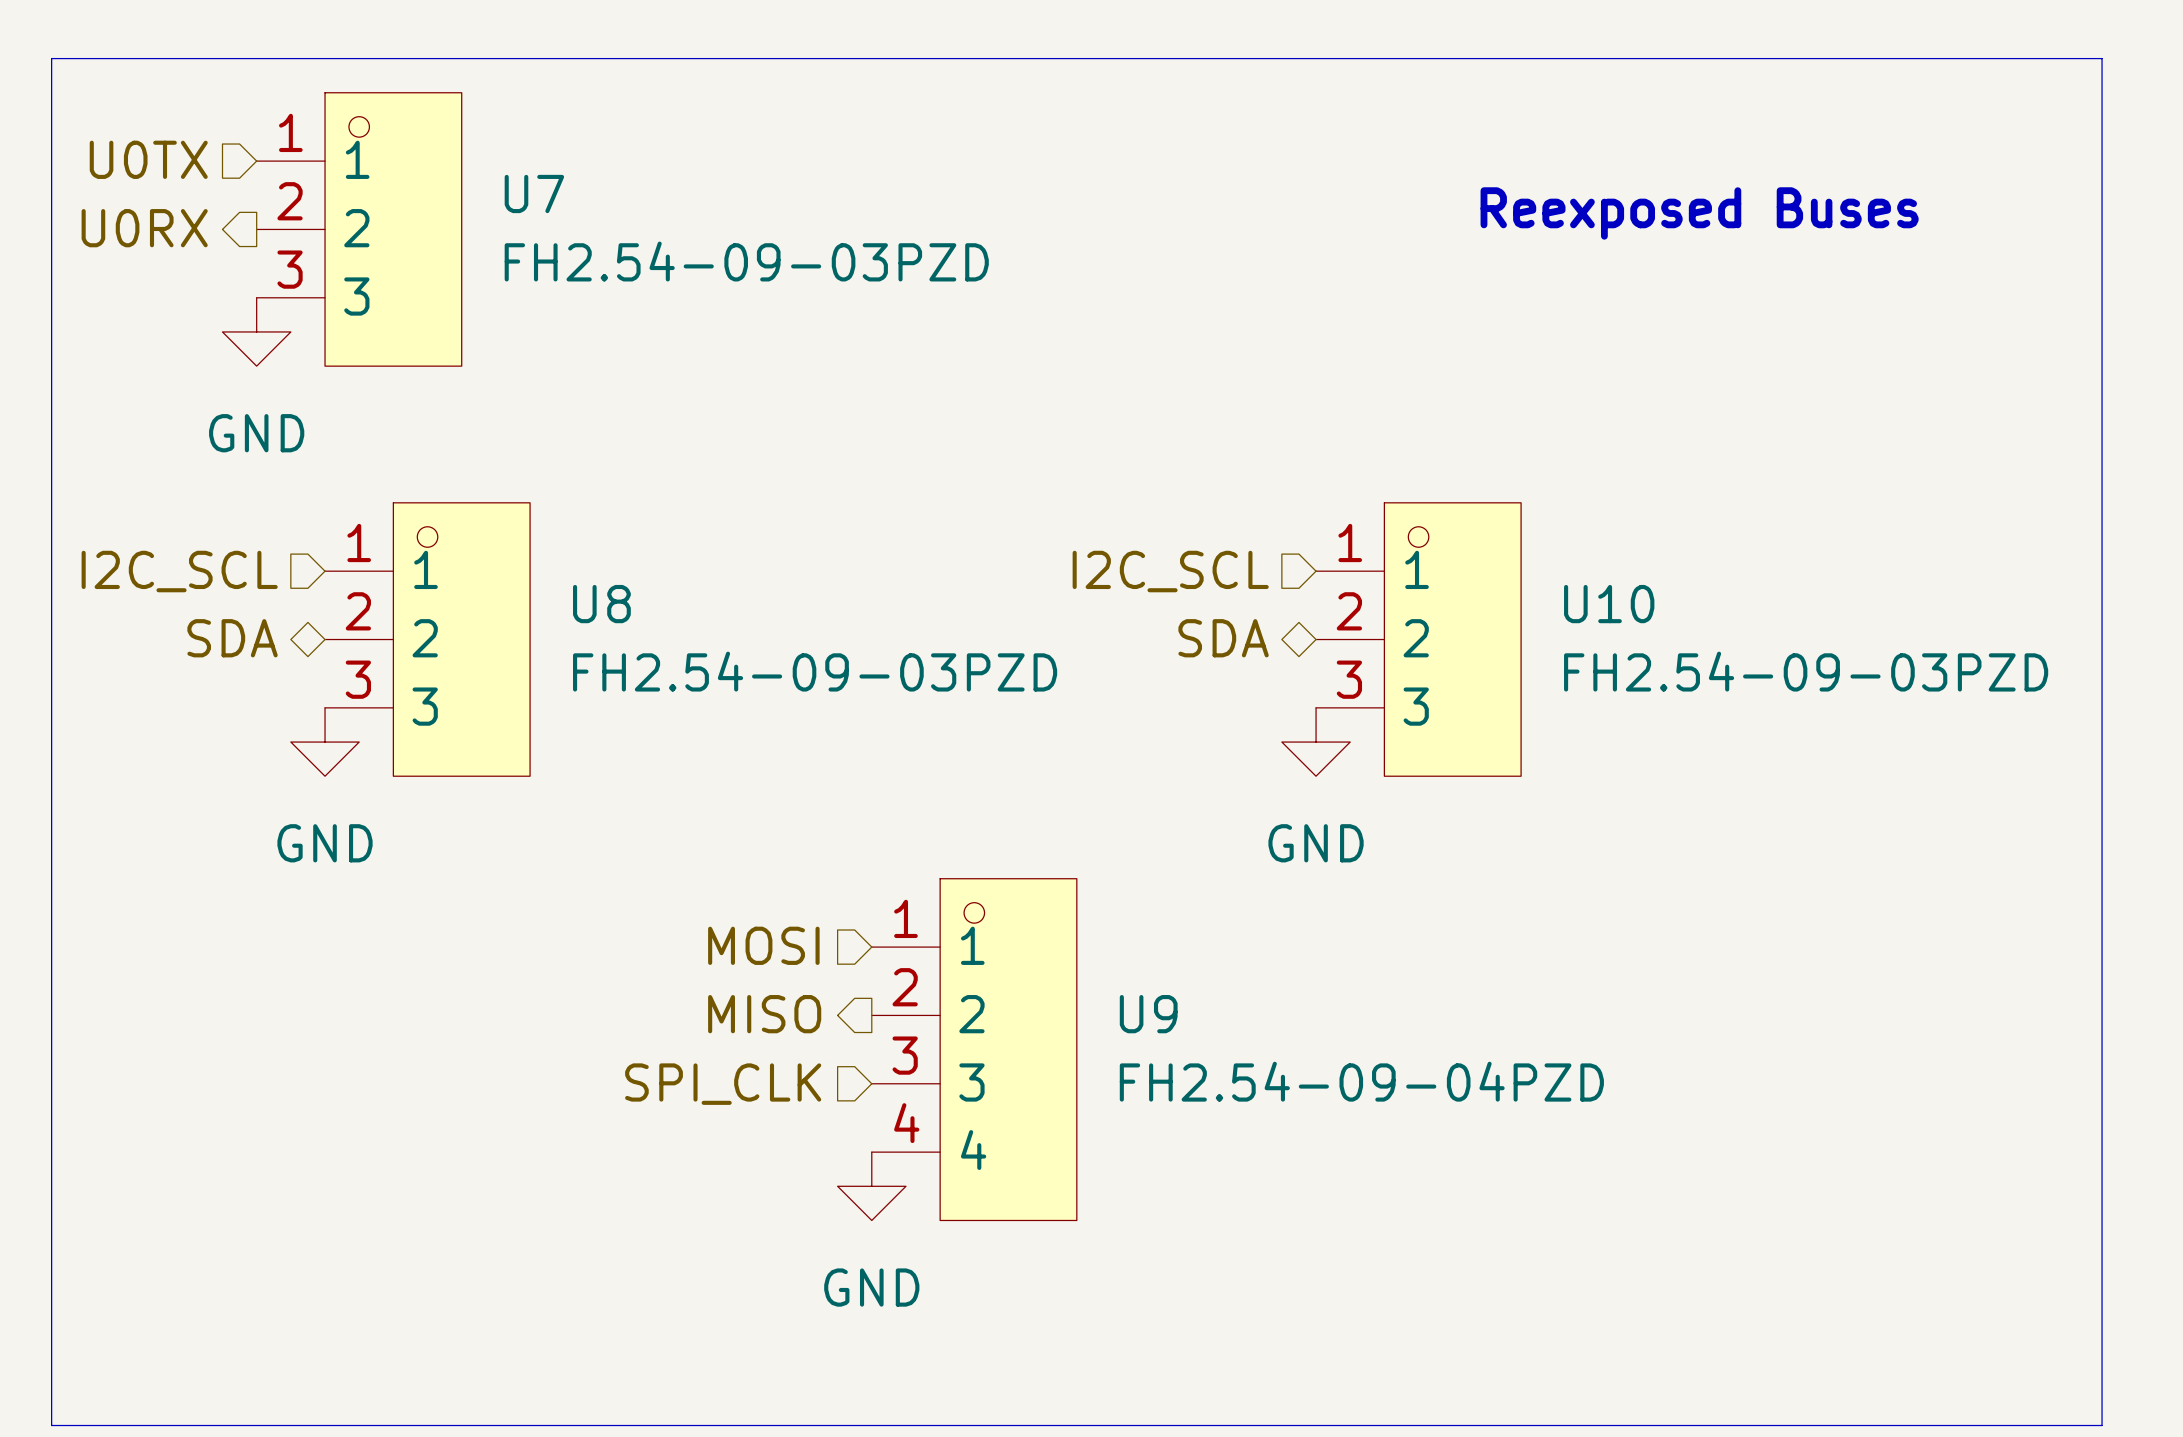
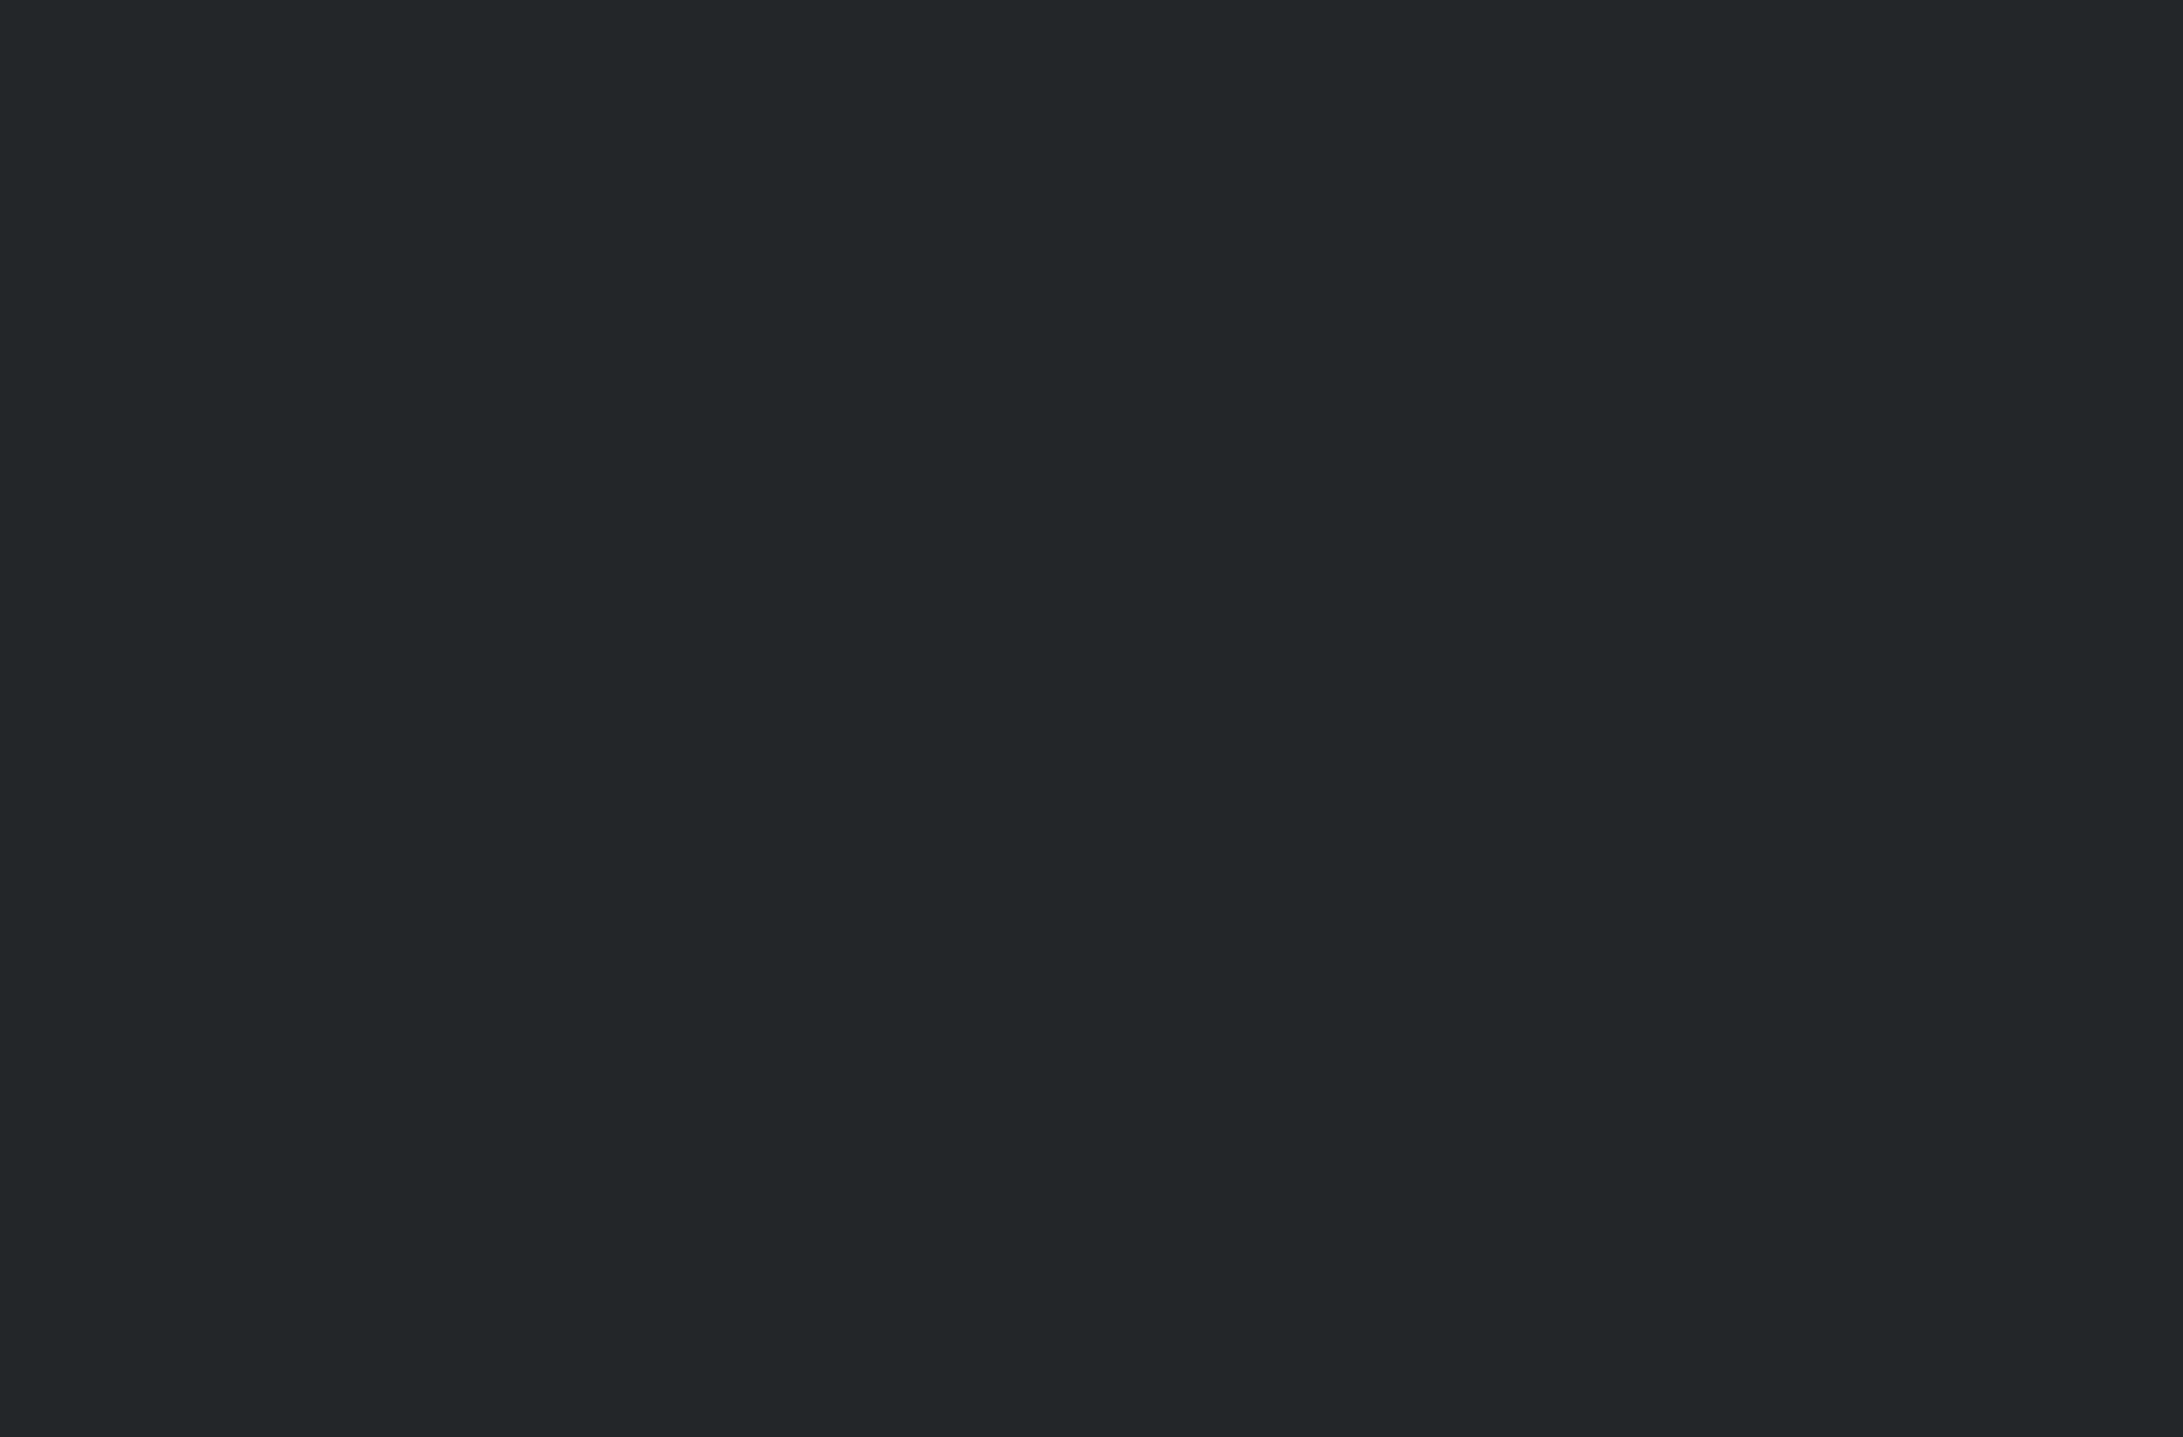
line: (51, 58) (2102, 58) (2102, 1425) (51, 1425) (51, 58) -> none
hierarchical label: U0TX (148, 159) -> none
text: Reexposed Buses (1699, 213) -> none
hierarchical label: U0RX (144, 228) -> none
U7: FH2.54-09-03PZD (359, 229) -> none
power symbol: GND (256, 331) -> none
hierarchical label: I2C_SCL (179, 571) -> none
hierarchical label: I2C_SCL (1170, 571) -> none
hierarchical label: SDA (232, 638) -> none
hierarchical label: SDA (1223, 638) -> none
U8: FH2.54-09-03PZD (427, 639) -> none
U10: FH2.54-09-03PZD (1418, 639) -> none
power symbol: GND (325, 742) -> none
power symbol: GND (1316, 742) -> none
hierarchical label: MOSI (763, 945) -> none
hierarchical label: MISO (764, 1014) -> none
U9: FH2.54-09-04PZD (974, 1049) -> none
hierarchical label: SPI_CLK (723, 1084) -> none
power symbol: GND (871, 1186) -> none

